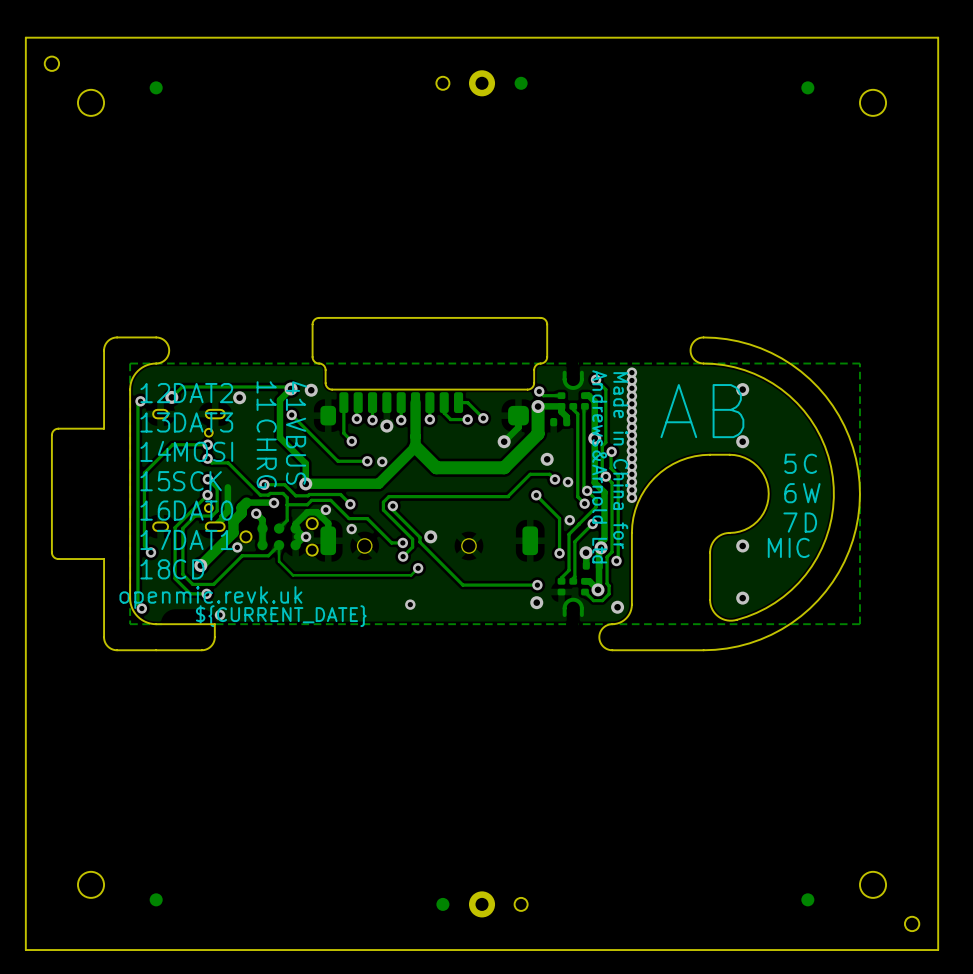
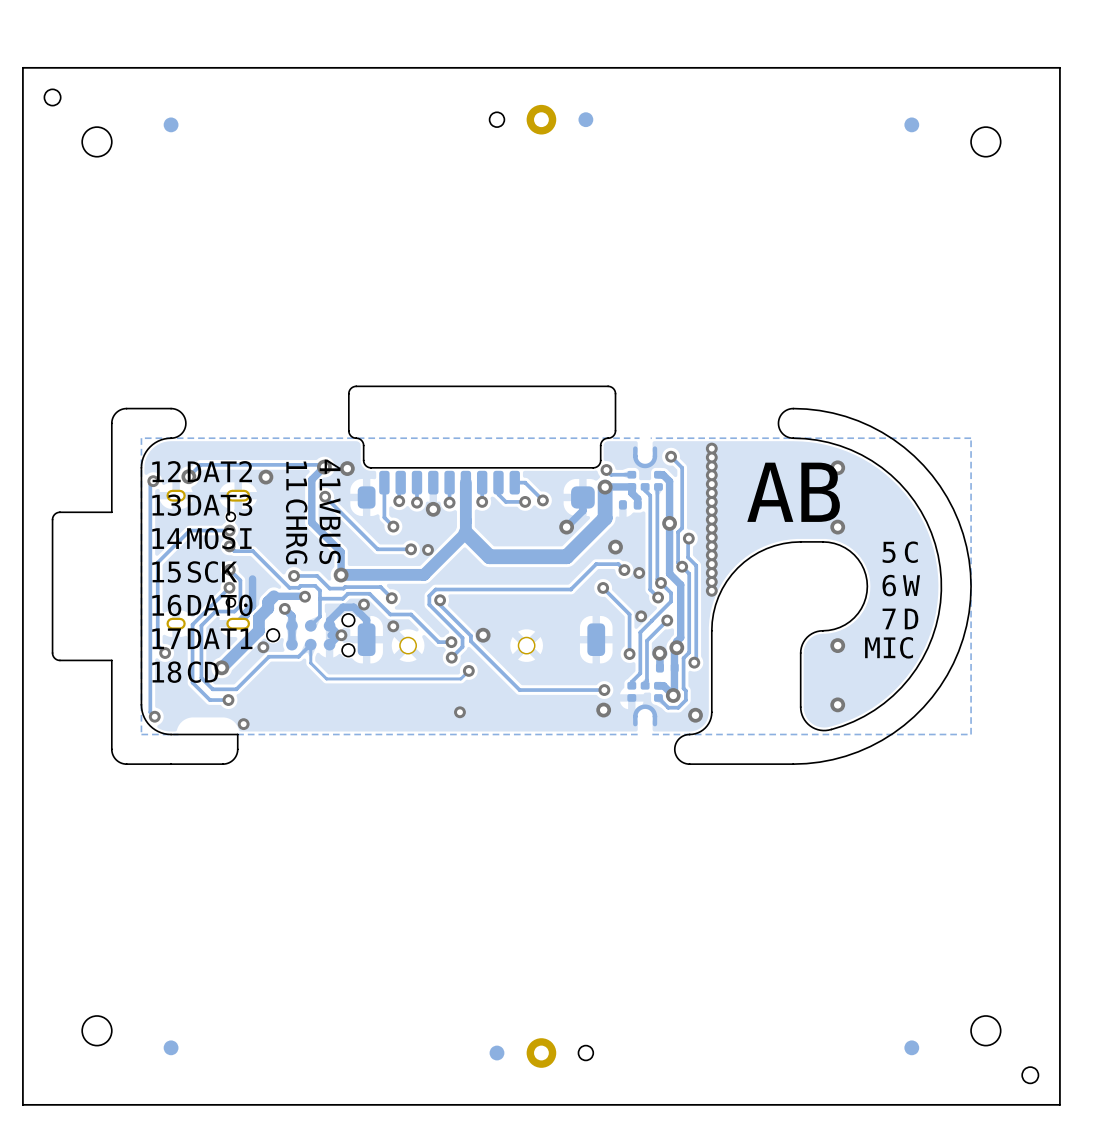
text: Made in China for (620, 460) -> none
text: Andrews&Arnold Ltd (599, 466) -> none
text: openmic.revk.uk (210, 597) -> none
text: ${CURRENT_DATE} (281, 616) -> none

